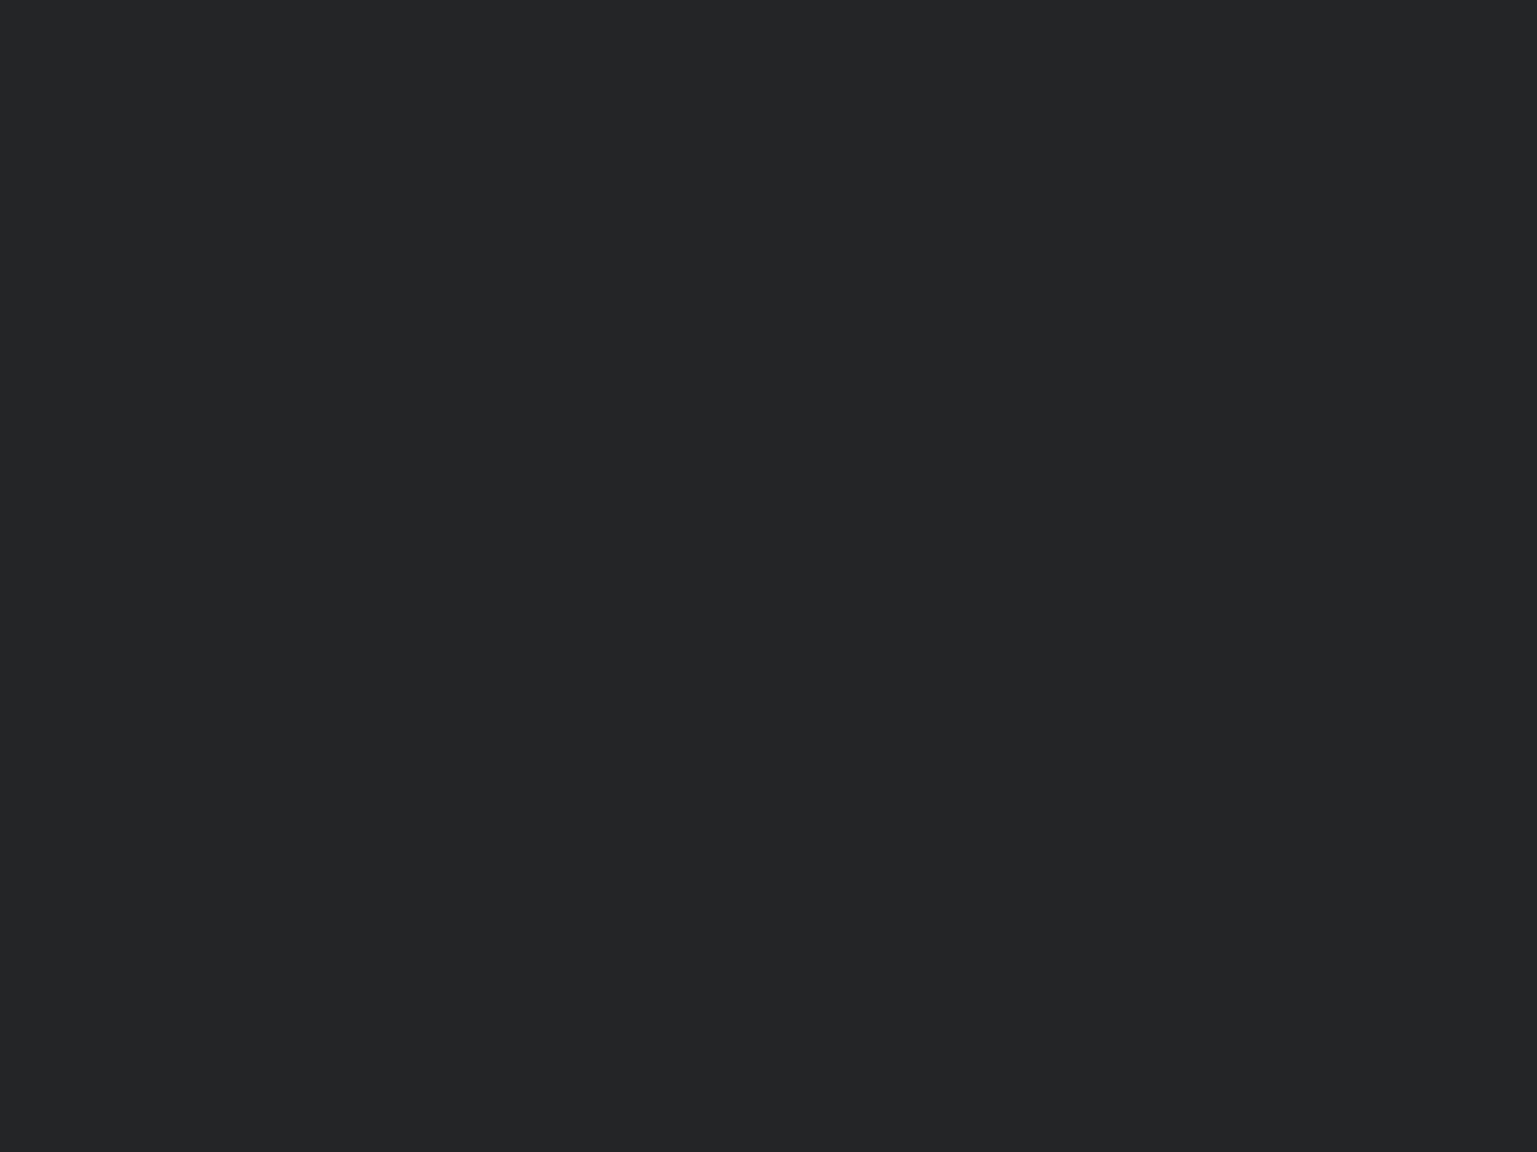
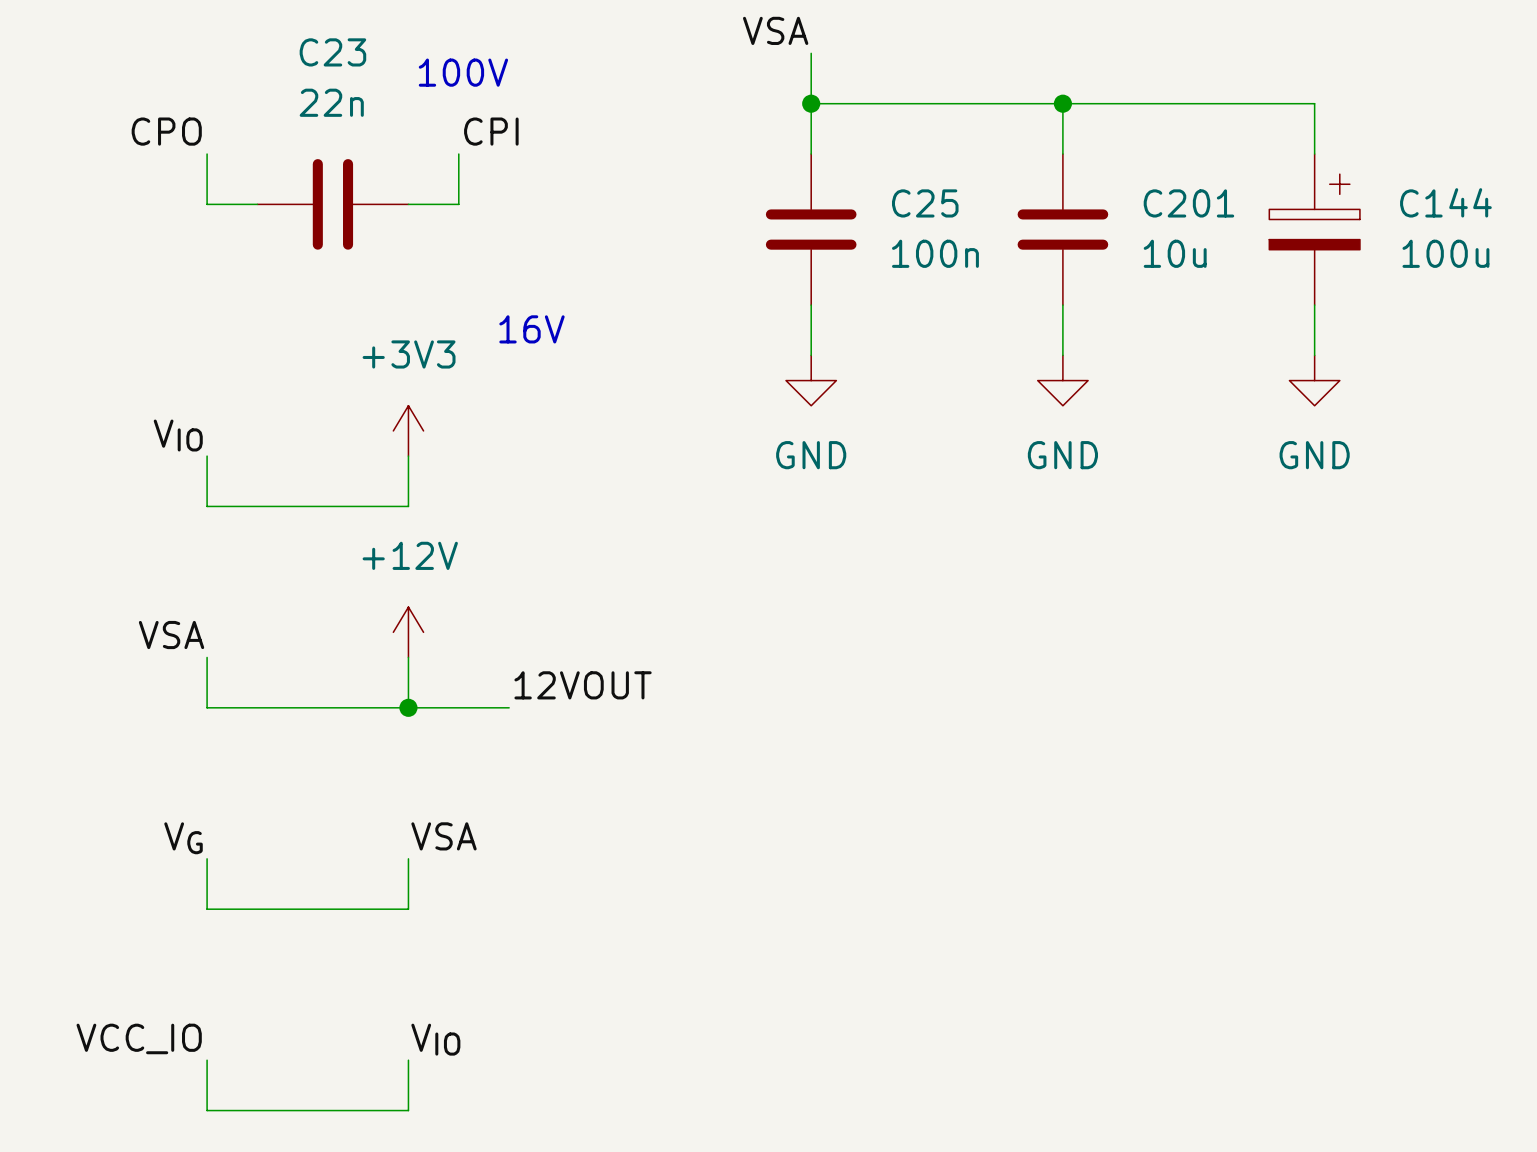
label: none -> VSA (775, 30)
wire: none -> (811, 53) (811, 154)
text: none -> 100V (463, 72)
wire: none -> (811, 103) (1314, 103) (1314, 154)
junction: none -> (811, 103)
wire: none -> (1062, 103) (1062, 154)
junction: none -> (1062, 103)
label: none -> CPO (166, 131)
label: none -> CPI (491, 131)
wire: none -> (207, 154) (207, 204) (257, 204)
wire: none -> (458, 154) (458, 204) (408, 204)
C23: none -> 22n (332, 204)
C25: none -> 100n (811, 229)
C201: none -> 10u (1062, 229)
C144: none -> 100u (1314, 229)
wire: none -> (811, 305) (811, 355)
wire: none -> (1062, 305) (1062, 355)
wire: none -> (1314, 305) (1314, 355)
text: none -> 16V (531, 329)
power symbol: none -> GND (811, 380)
power symbol: none -> GND (1062, 380)
power symbol: none -> GND (1314, 380)
power symbol: none -> +3V3 (408, 430)
label: none -> VIO (178, 435)
wire: none -> (207, 456) (207, 506) (408, 506) (408, 456)
power symbol: none -> +12V (408, 632)
label: none -> VSA (171, 635)
wire: none -> (207, 657) (207, 707) (509, 707)
wire: none -> (408, 657) (408, 707)
label: none -> 12VOUT (583, 685)
junction: none -> (408, 707)
label: none -> VSA (444, 836)
label: none -> VG (183, 838)
wire: none -> (207, 858) (207, 909) (408, 909) (408, 858)
label: none -> VIO (435, 1039)
label: none -> VCC_IO (139, 1038)
wire: none -> (207, 1060) (207, 1110) (408, 1110) (408, 1060)

